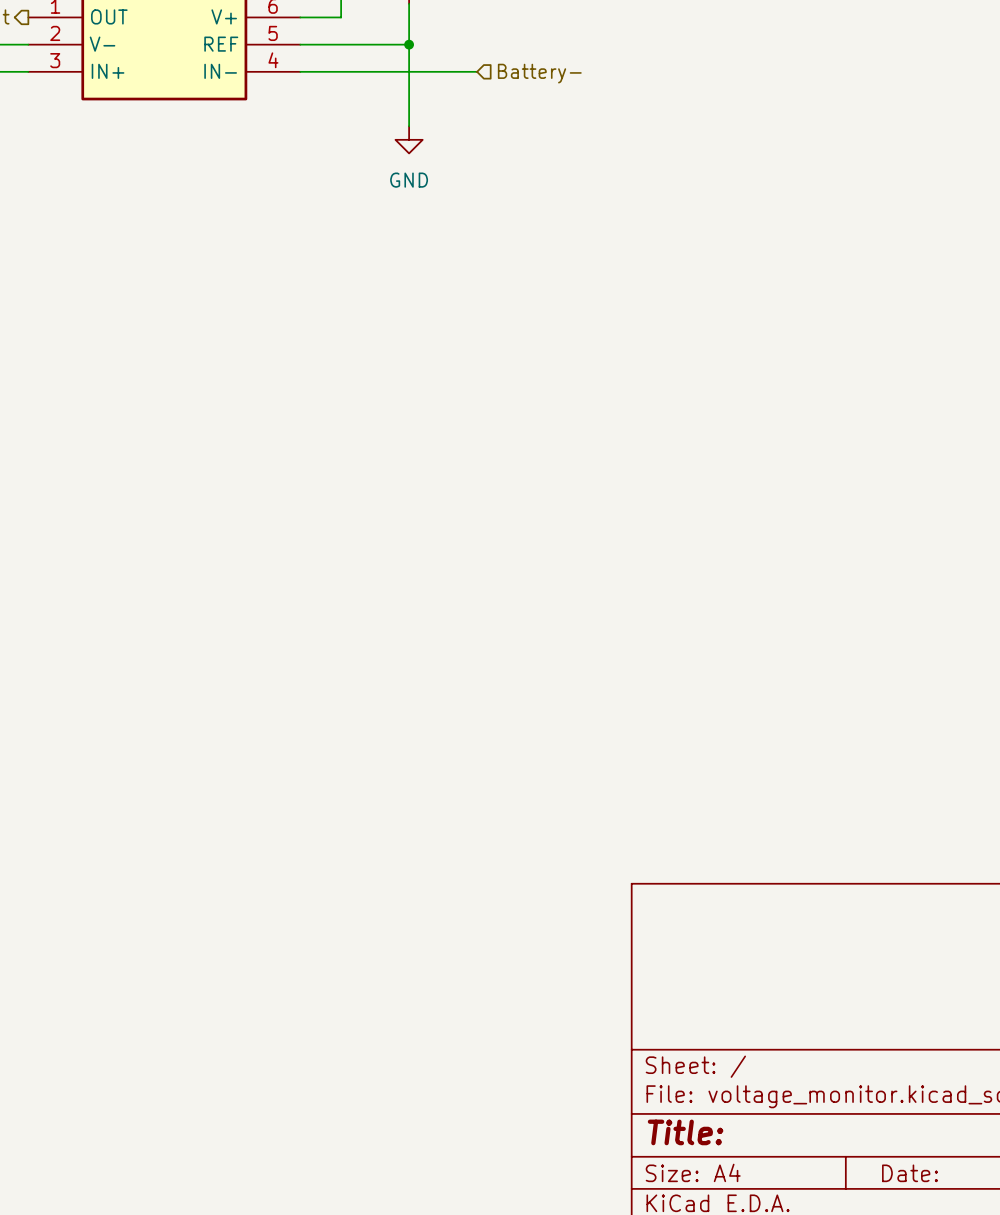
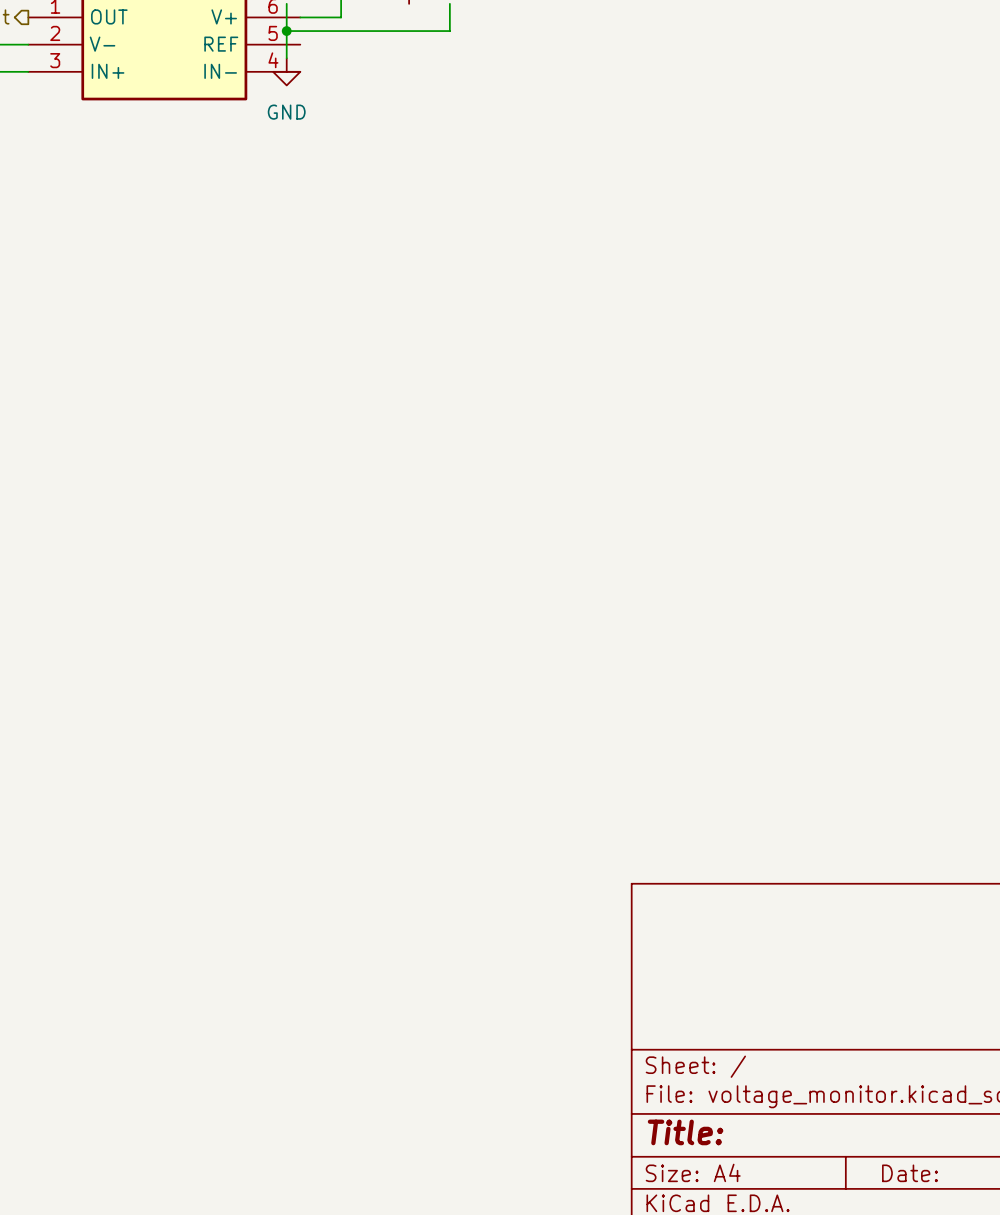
wire: none -> (286, 3) (286, 58)
wire: (409, 3) (409, 126) -> none
wire: none -> (449, 3) (449, 31) (286, 31)
junction: none -> (286, 31)
wire: (300, 44) (409, 44) -> none
junction: (409, 44) -> none
wire: (300, 71) (477, 71) -> none
hierarchical label: Battery- (539, 73) -> none
power symbol position: GND (409, 139) -> GND (286, 71)

